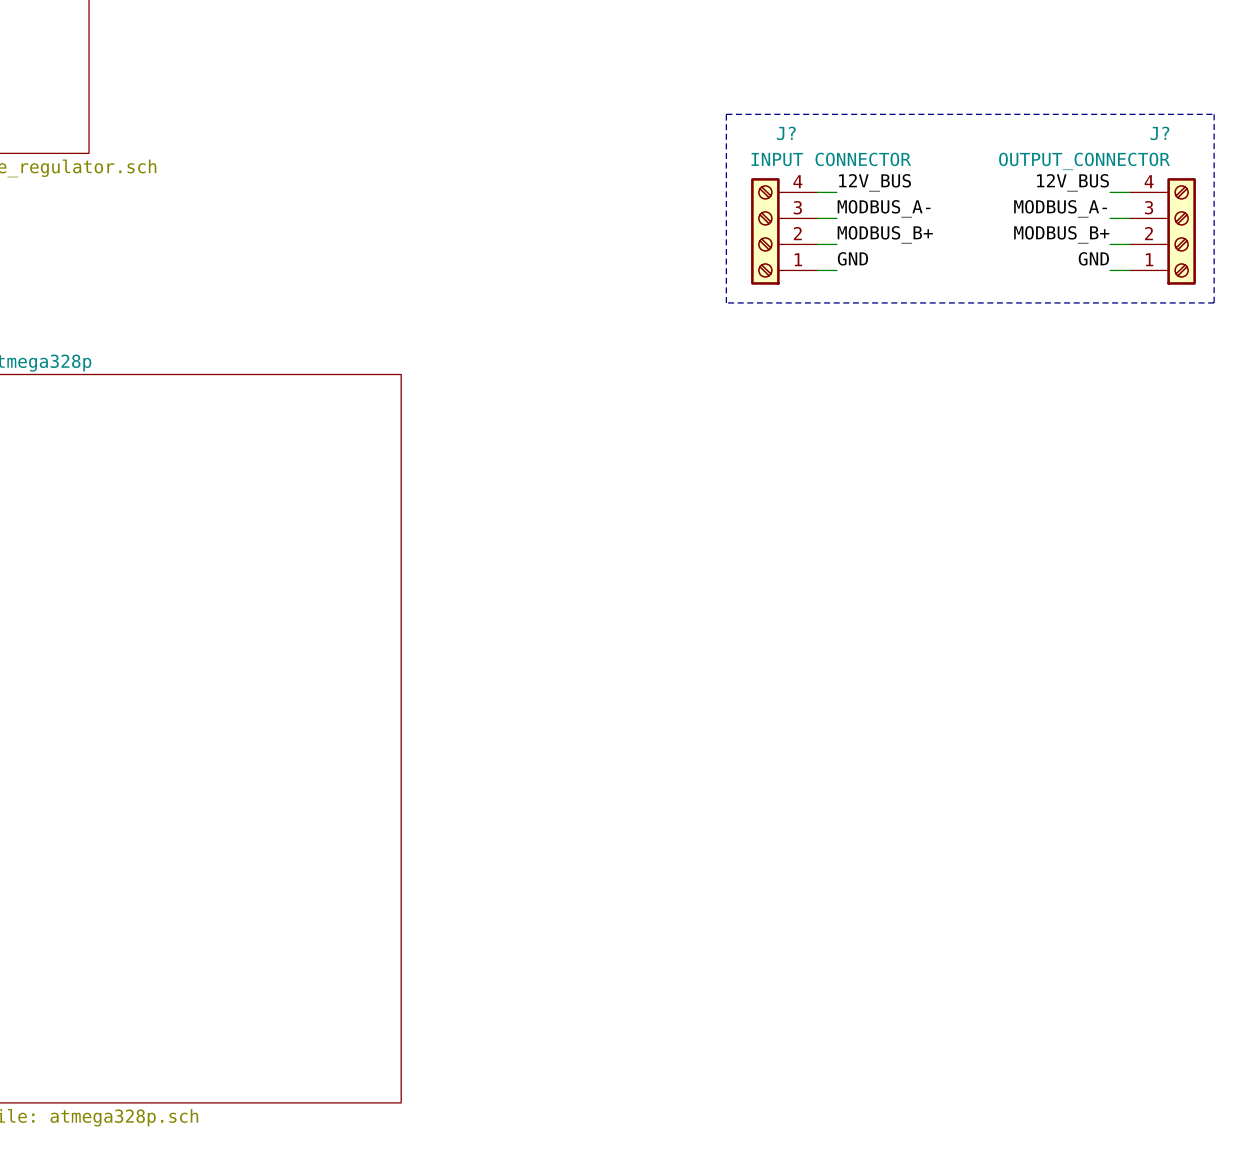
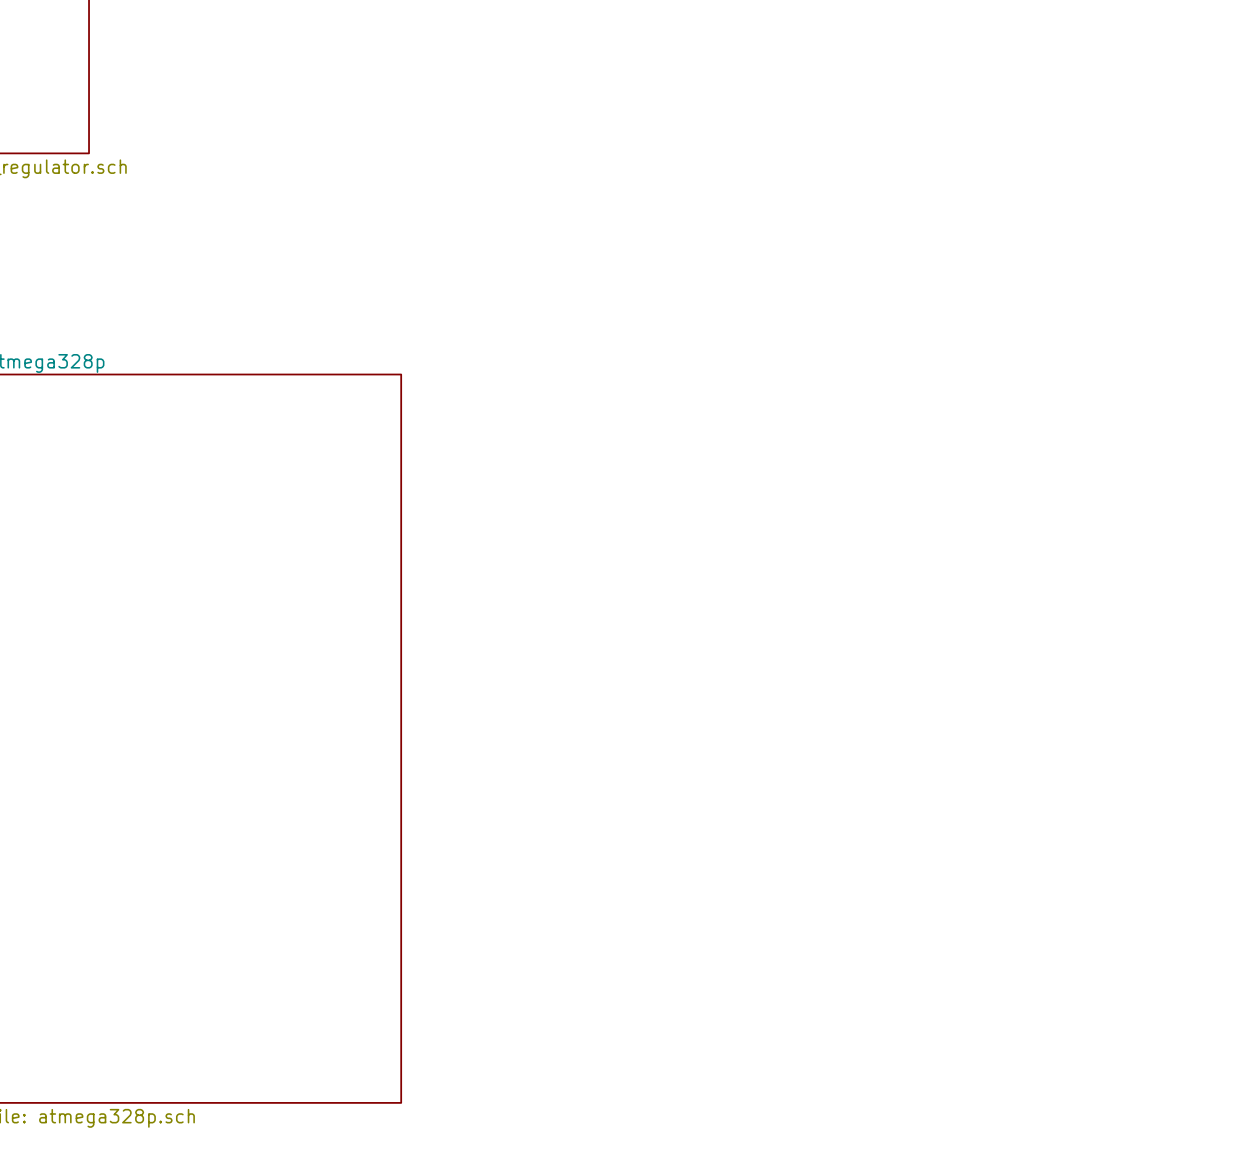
line: (726, 114) (1214, 114) (1214, 302) (726, 302) (726, 114) -> none
label: 12V_BUS (875, 182) -> none
label: 12V_BUS (1072, 182) -> none
wire: (817, 192) (836, 192) -> none
wire: (1110, 192) (1129, 192) -> none
label: MODBUS_A- (884, 208) -> none
label: MODBUS_A- (1060, 208) -> none
wire: (817, 218) (836, 218) -> none
wire: (1110, 218) (1129, 218) -> none
J?: INPUT CONNECTOR (784, 231) -> none
J?: OUTPUT_CONNECTOR (1162, 231) -> none
label: MODBUS_B+ (885, 234) -> none
label: MODBUS_B+ (1061, 234) -> none
wire: (817, 244) (836, 244) -> none
wire: (1110, 244) (1129, 244) -> none
label: GND (852, 258) -> none
label: GND (1093, 258) -> none
wire: (817, 270) (836, 270) -> none
wire: (1110, 270) (1129, 270) -> none

